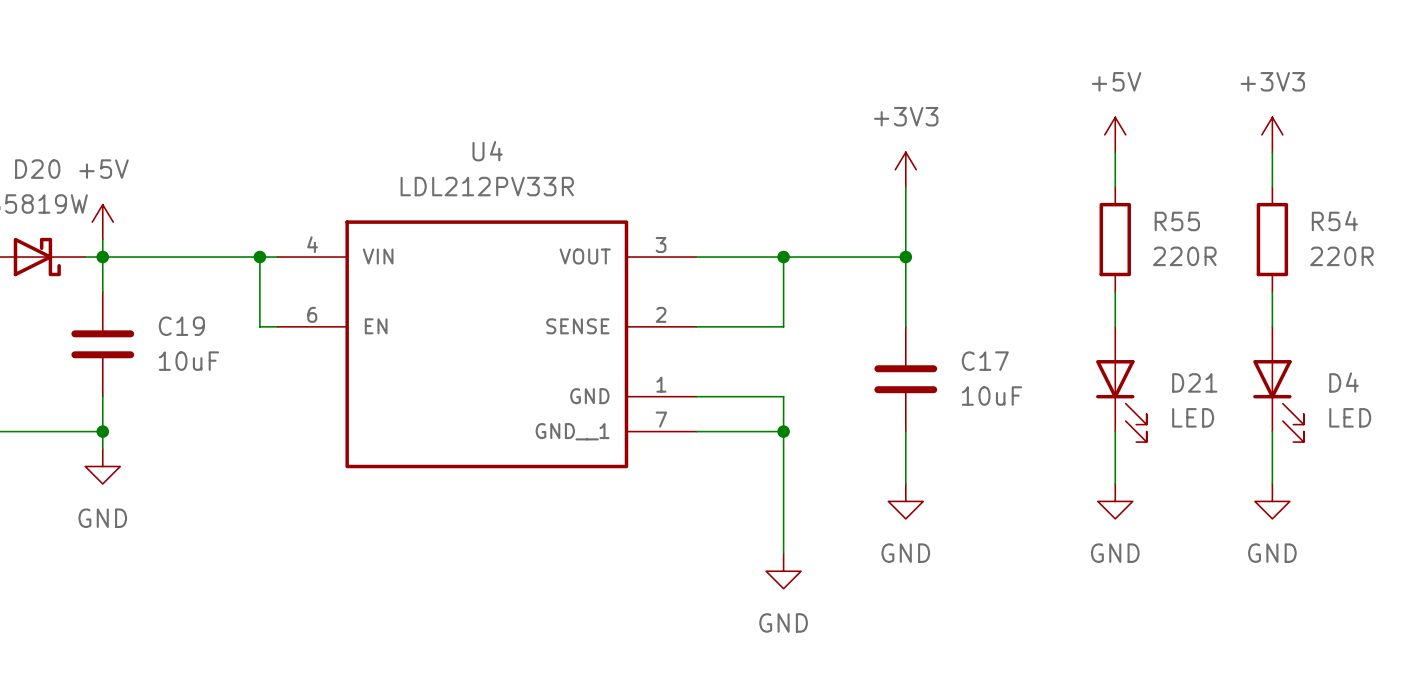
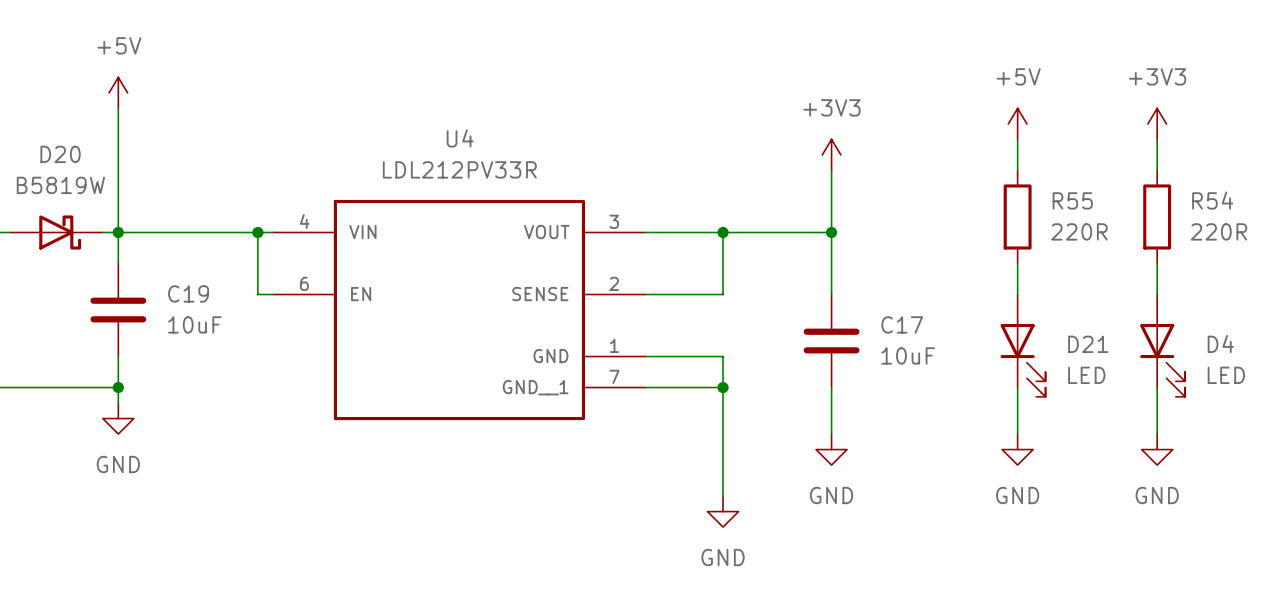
wire: none -> (118, 108) (118, 216)
power symbol position: +5V (102, 222) -> +5V (118, 92)

